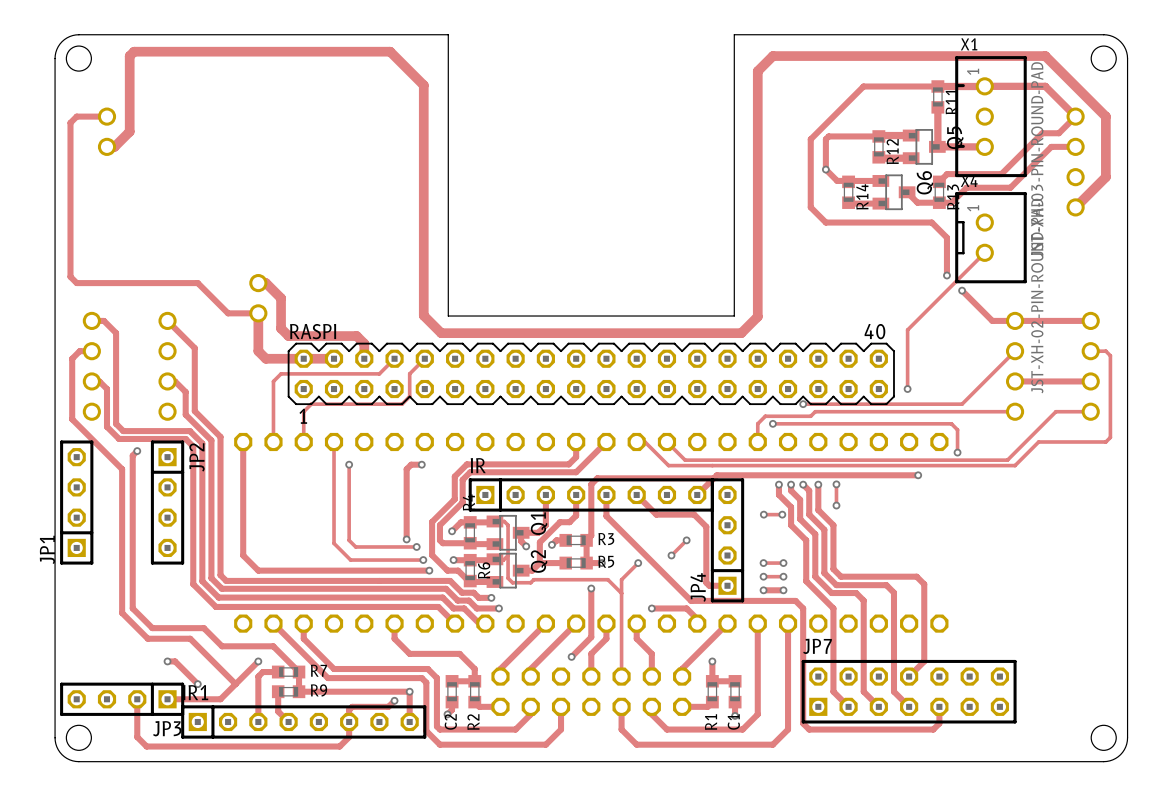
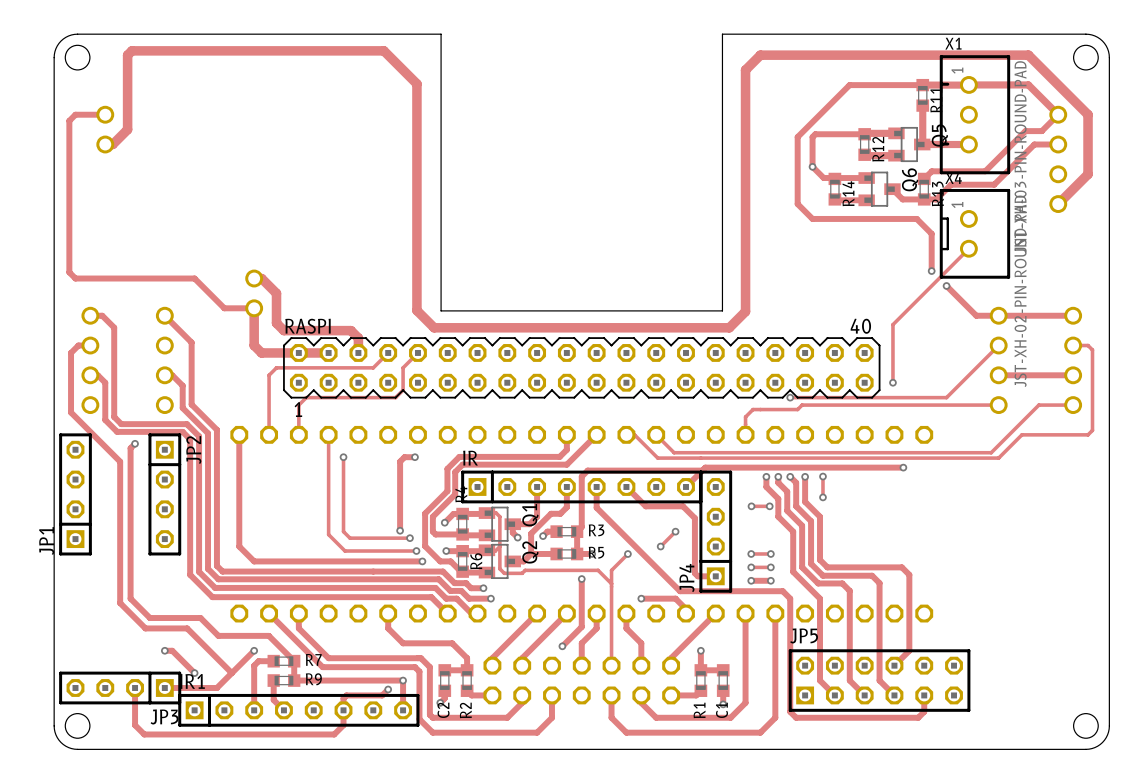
track: (772, 423) (951, 423) (957, 429) (957, 452) -> none
via: (772, 423) -> none
via: (957, 452) -> none
JP5: none -> (879, 680)
JP7: (909, 691) -> none

